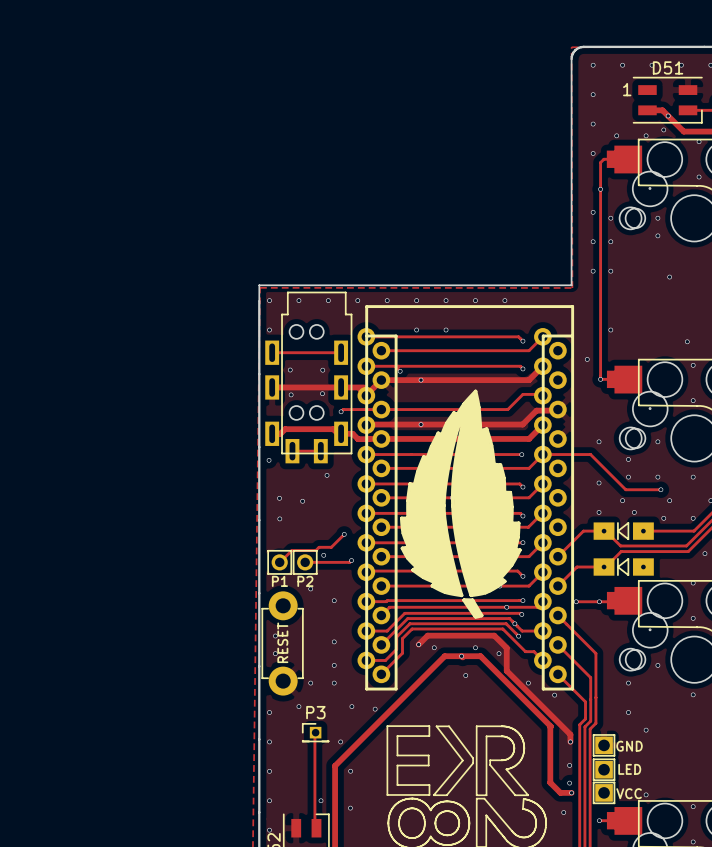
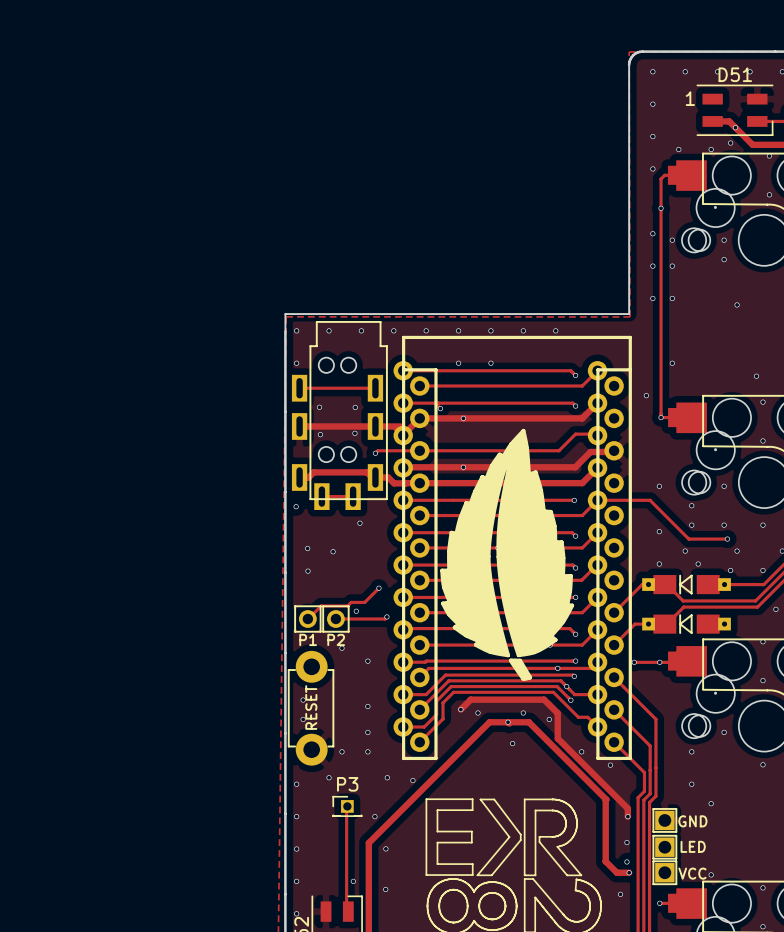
part footprint: [593, 522, 654, 541] -> [642, 574, 731, 595]
part footprint: [593, 558, 654, 576] -> [642, 614, 731, 634]

